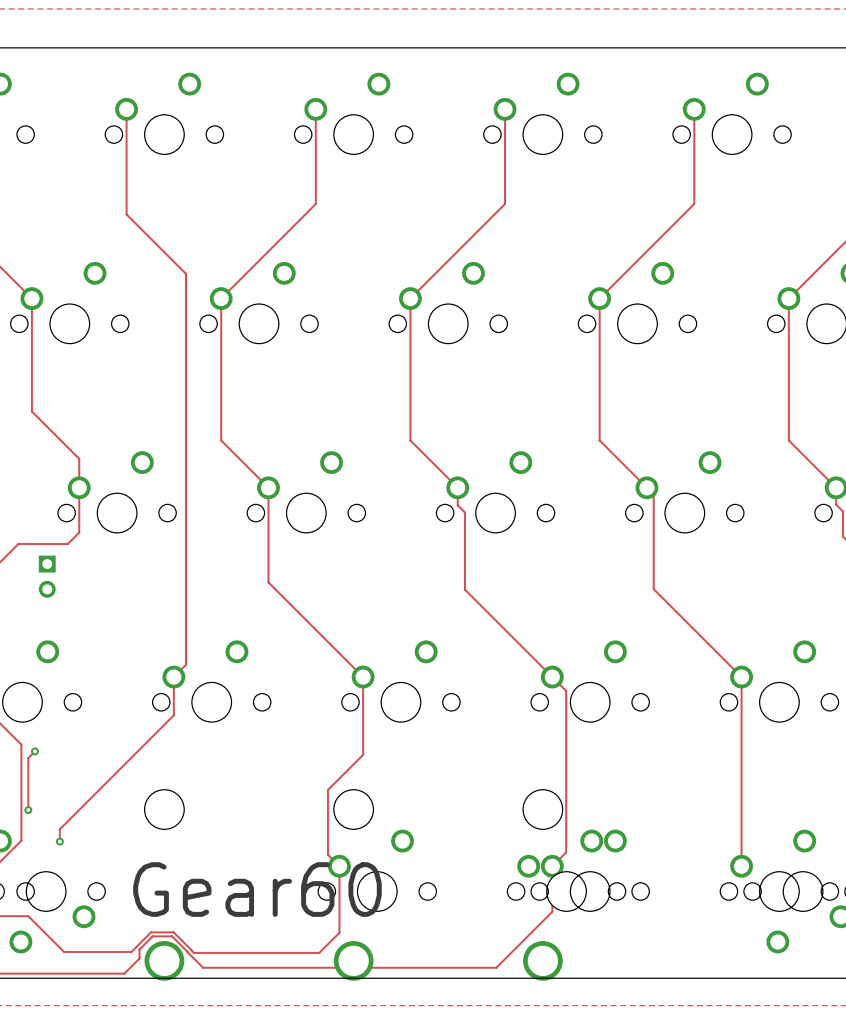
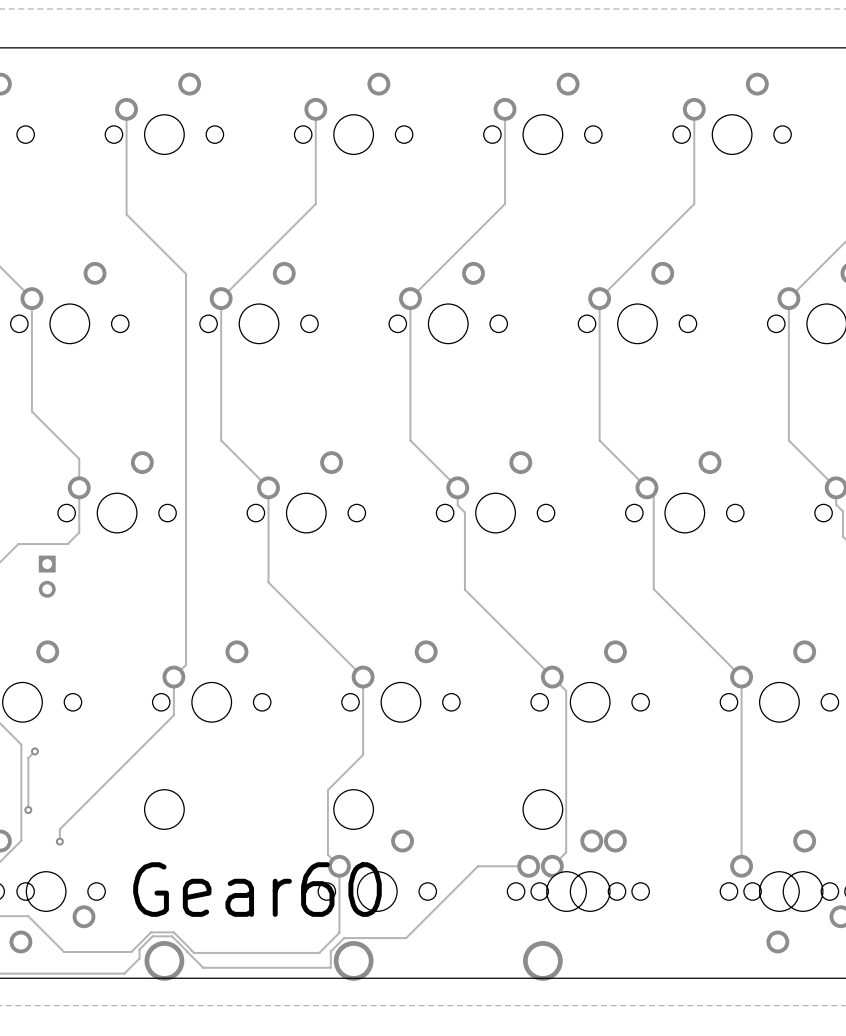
track: (552, 866) (552, 911) (496, 967) (330, 967) -> (528, 866) (477, 866) (406, 938) (344, 938) (330, 951) (330, 967)

